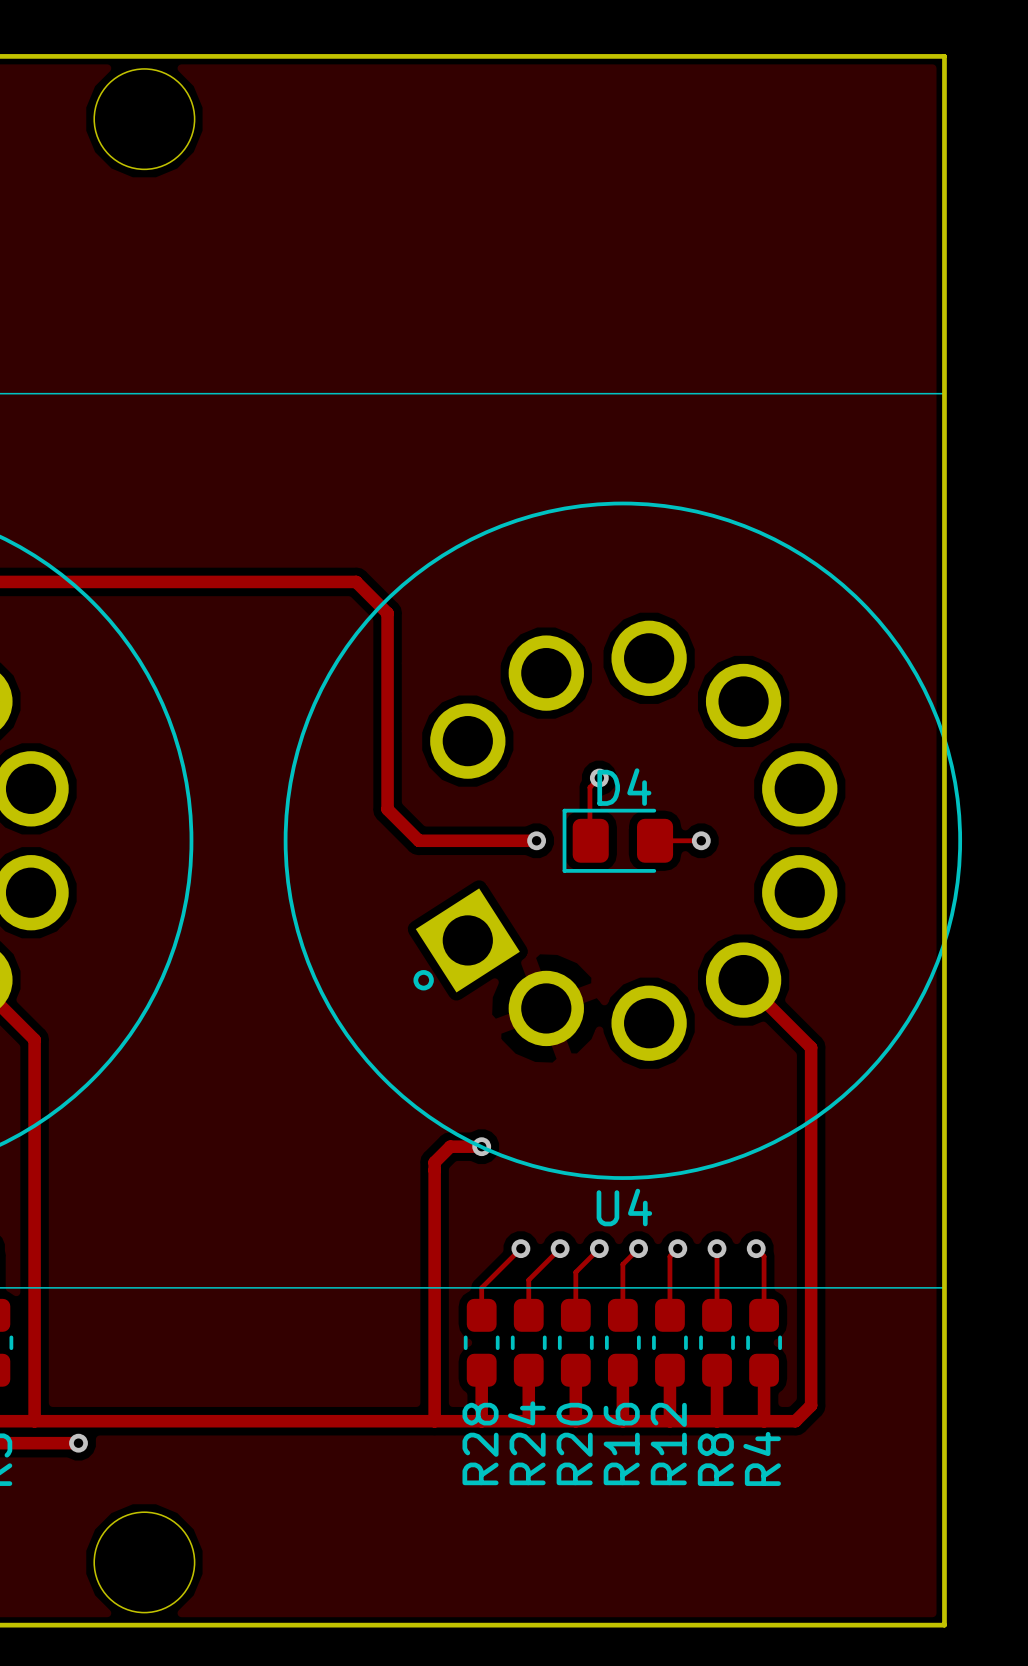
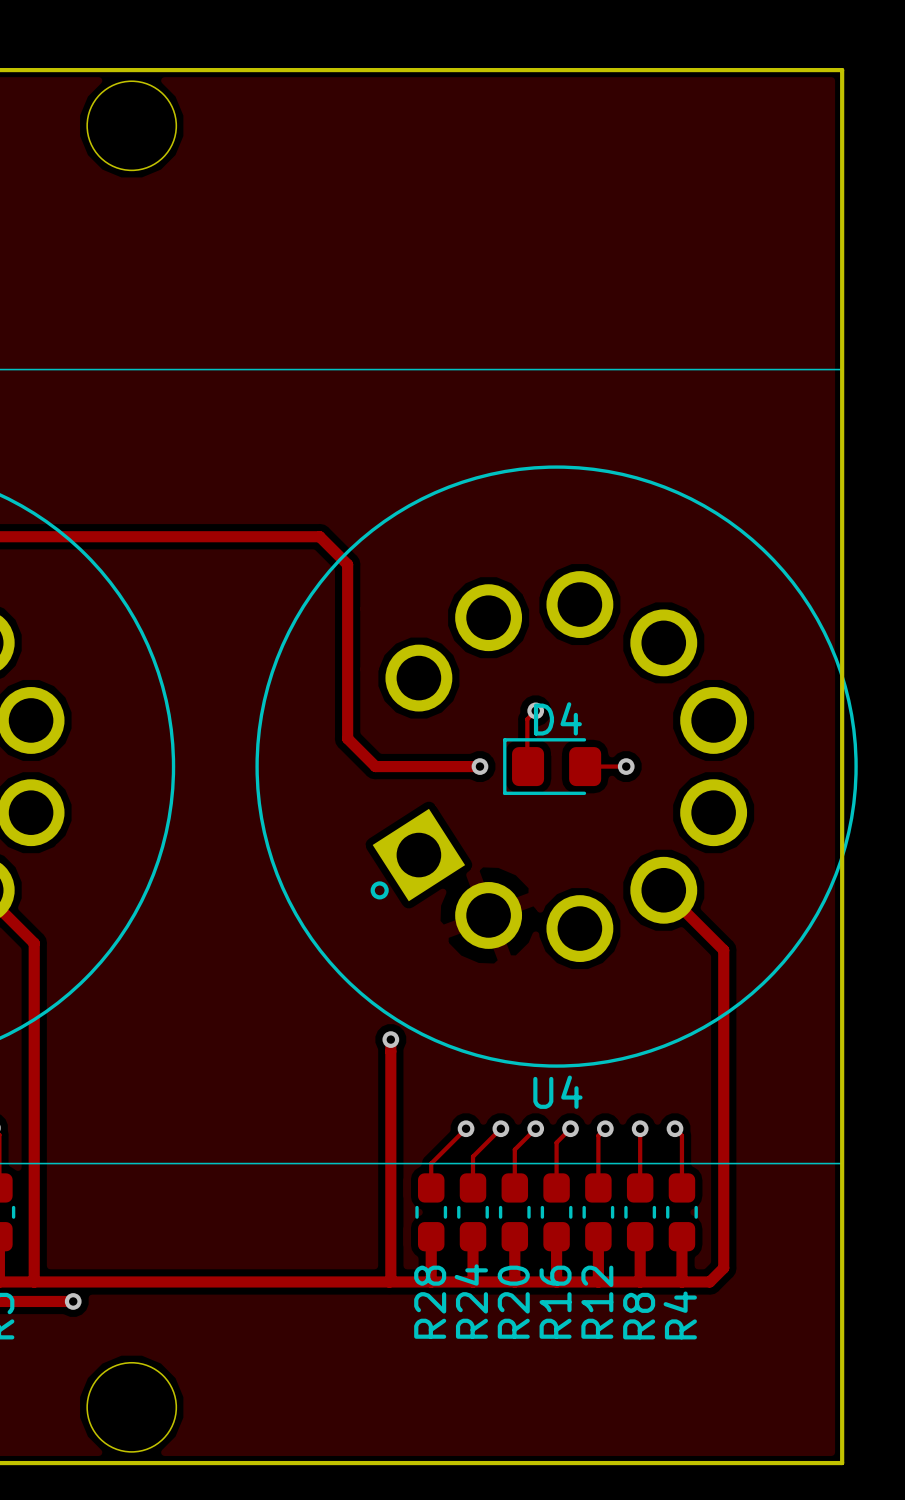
track: (481, 1146) (450, 1146) (434, 1162) (434, 1421) -> (390, 1039) (389, 1281)
via position: (481, 1146) -> (390, 1039)

